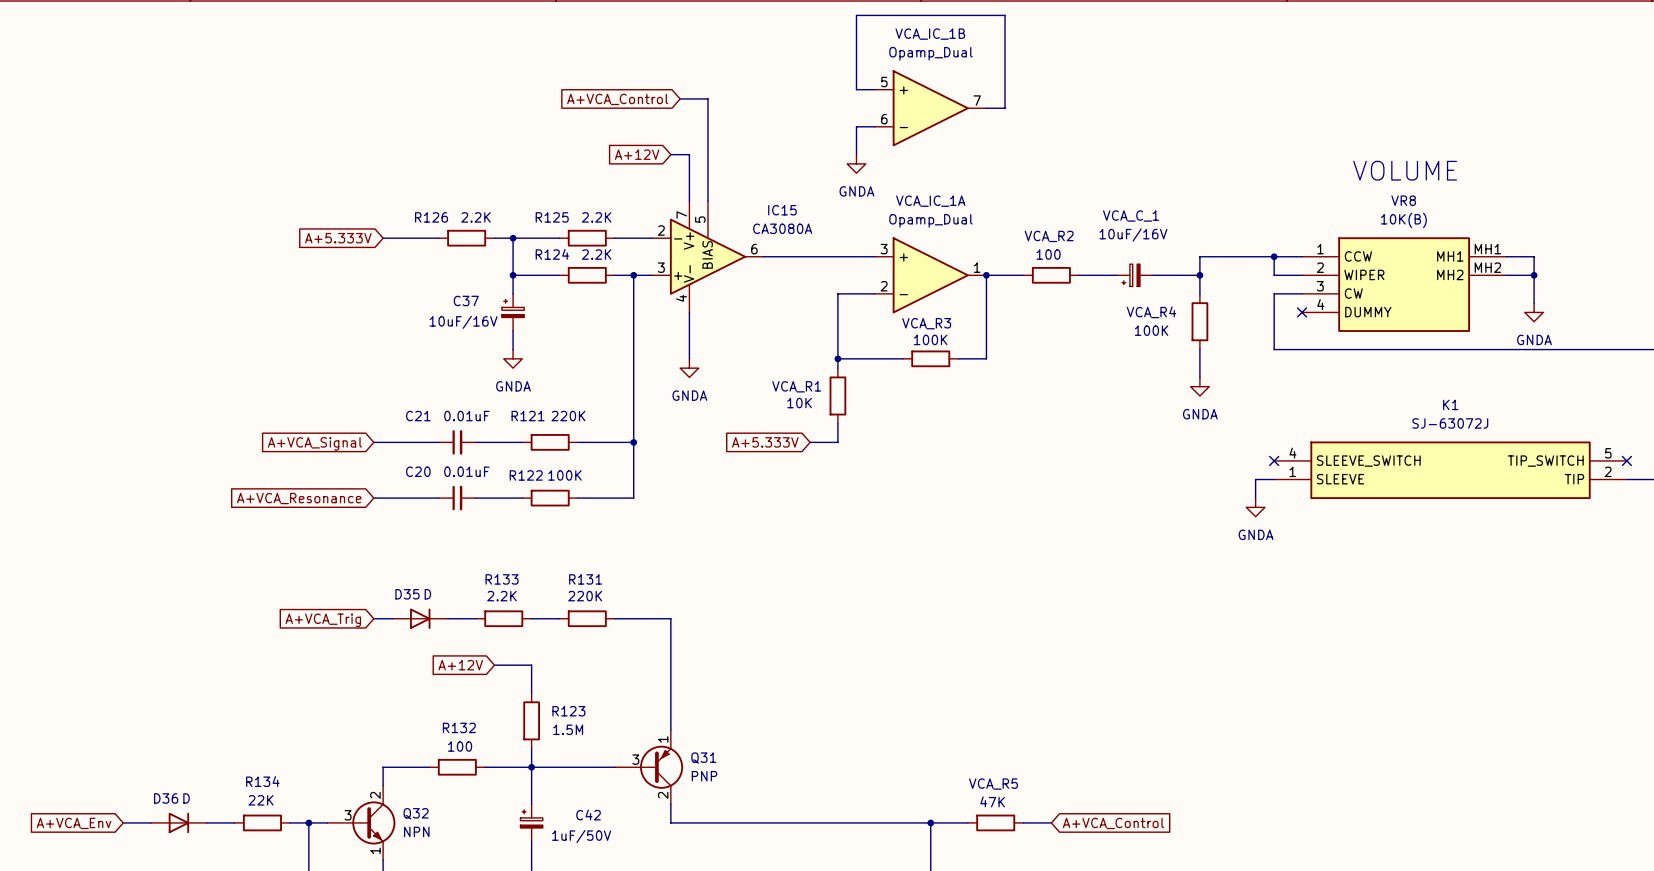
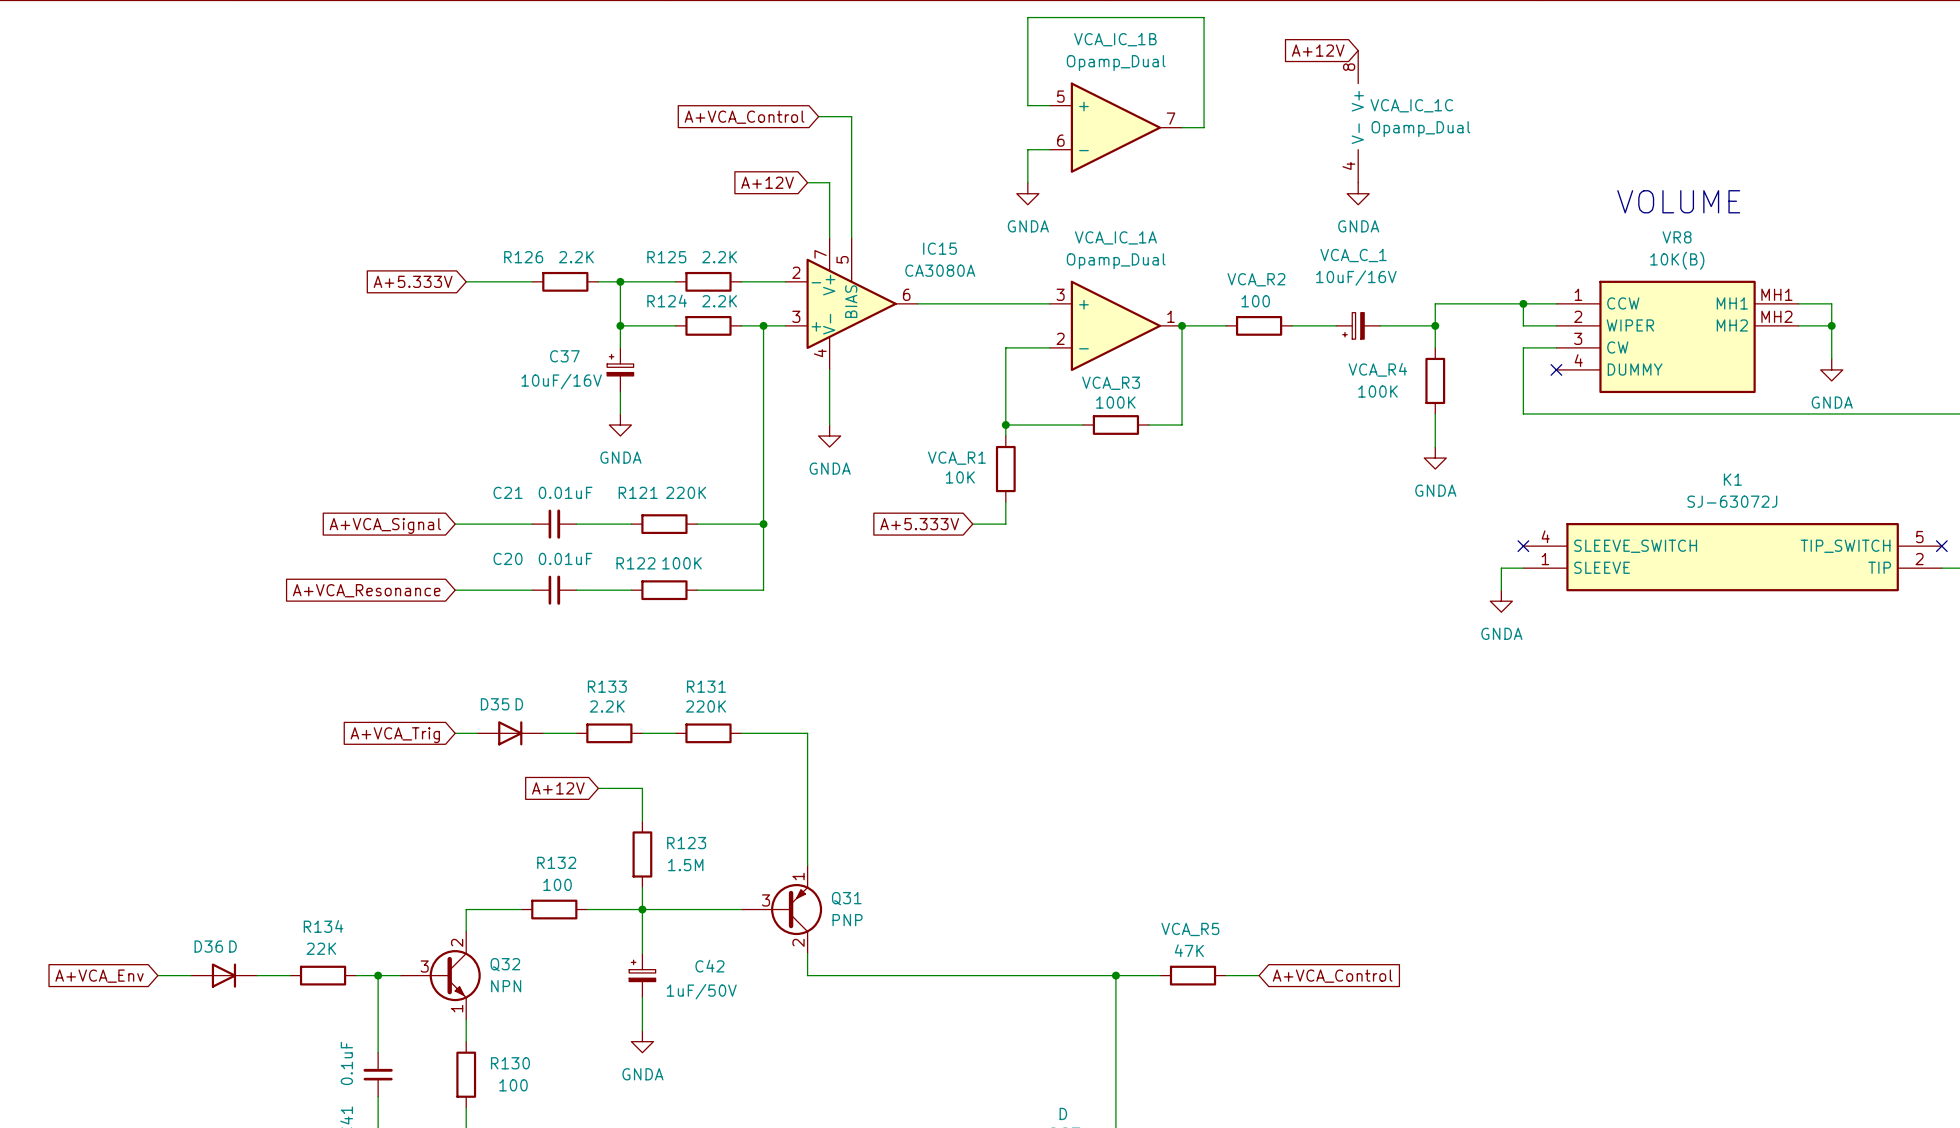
global label: none -> A+12V (1318, 50)
VCA_IC_1C: none -> Opamp_Dual (1358, 116)
power symbol: none -> GNDA (1358, 193)

